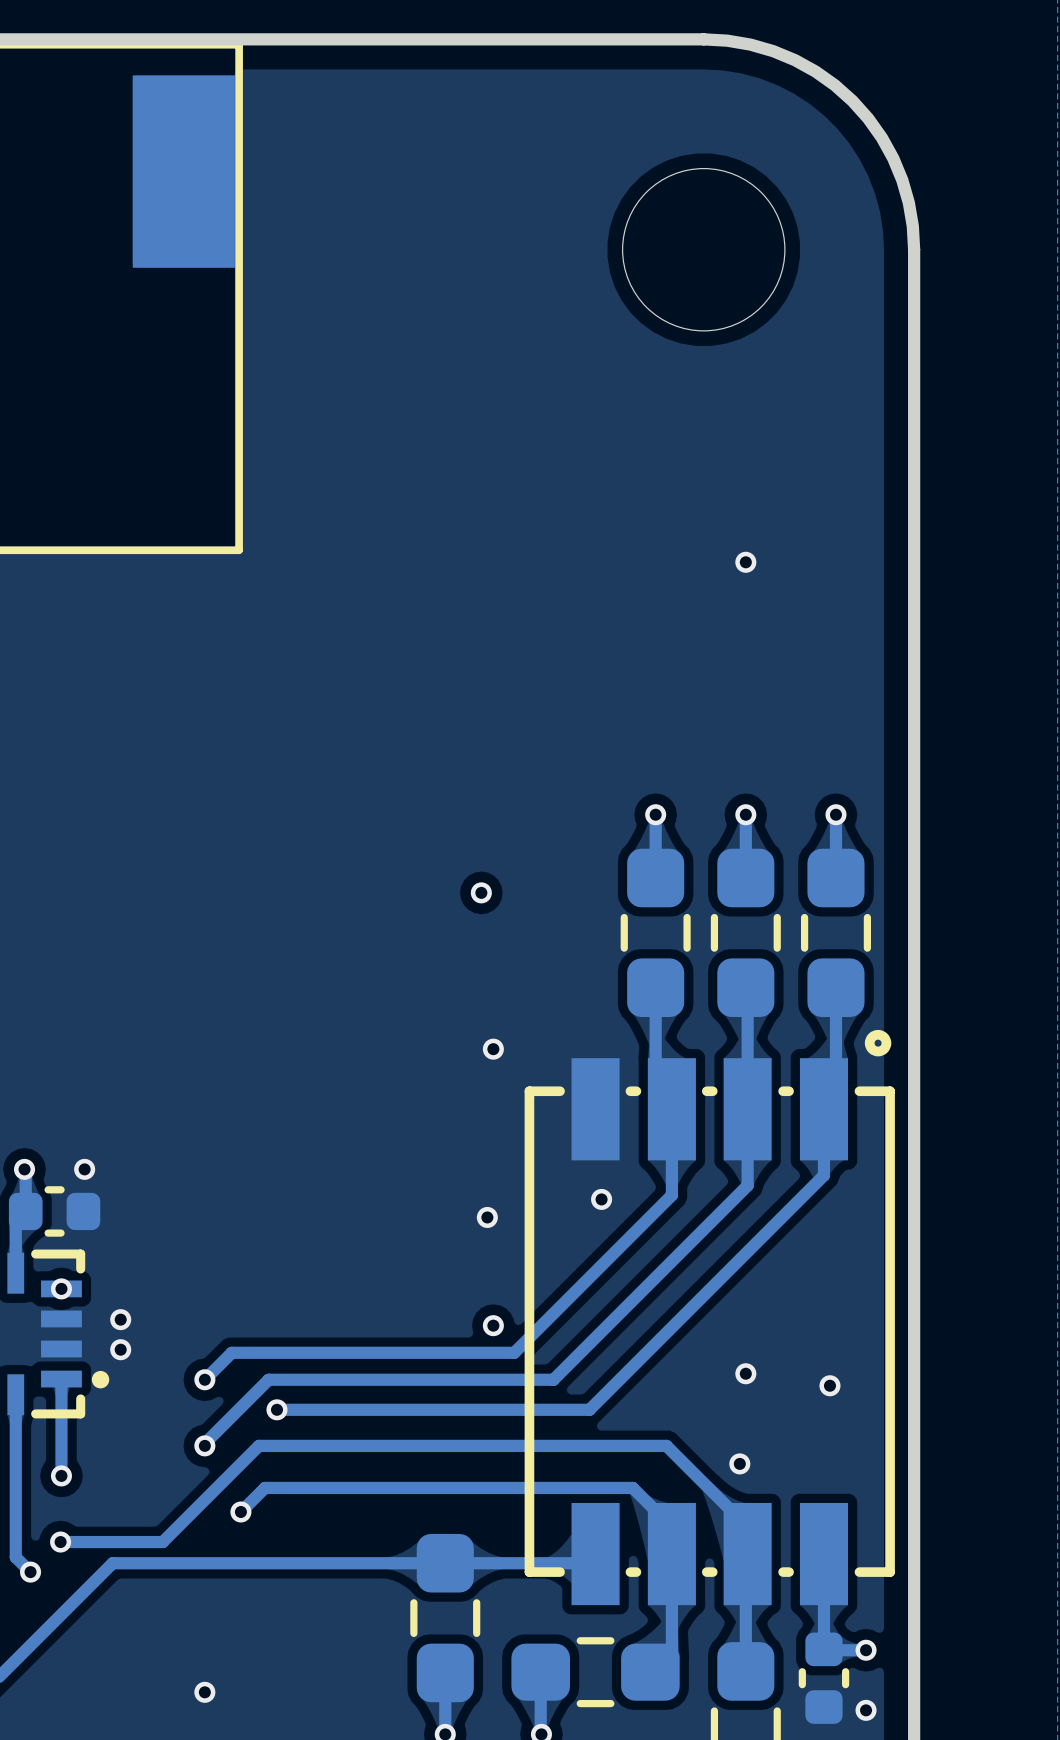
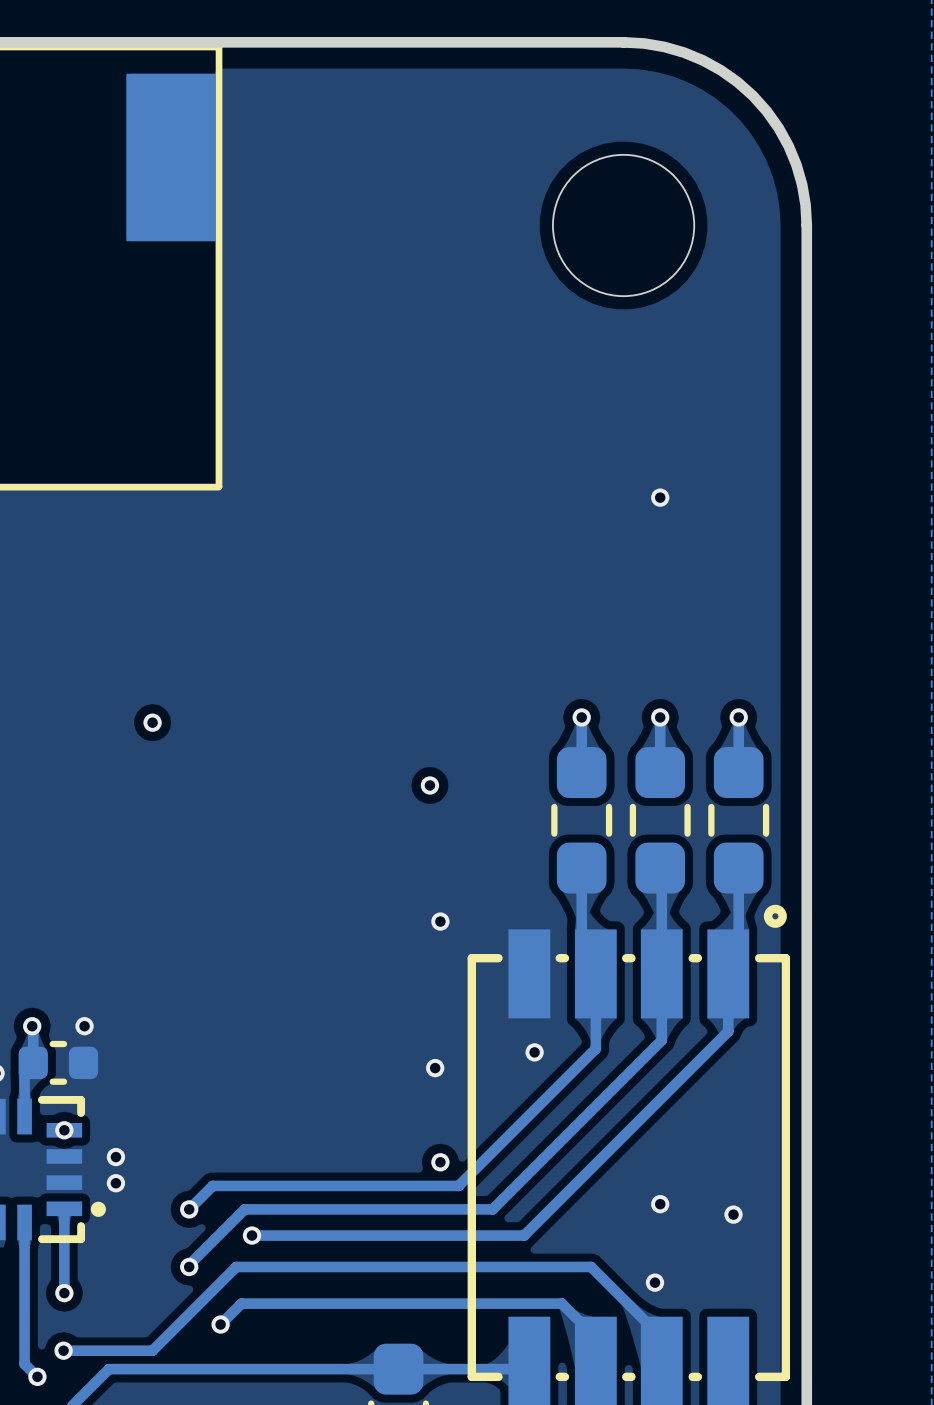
via: none -> (152, 722)

